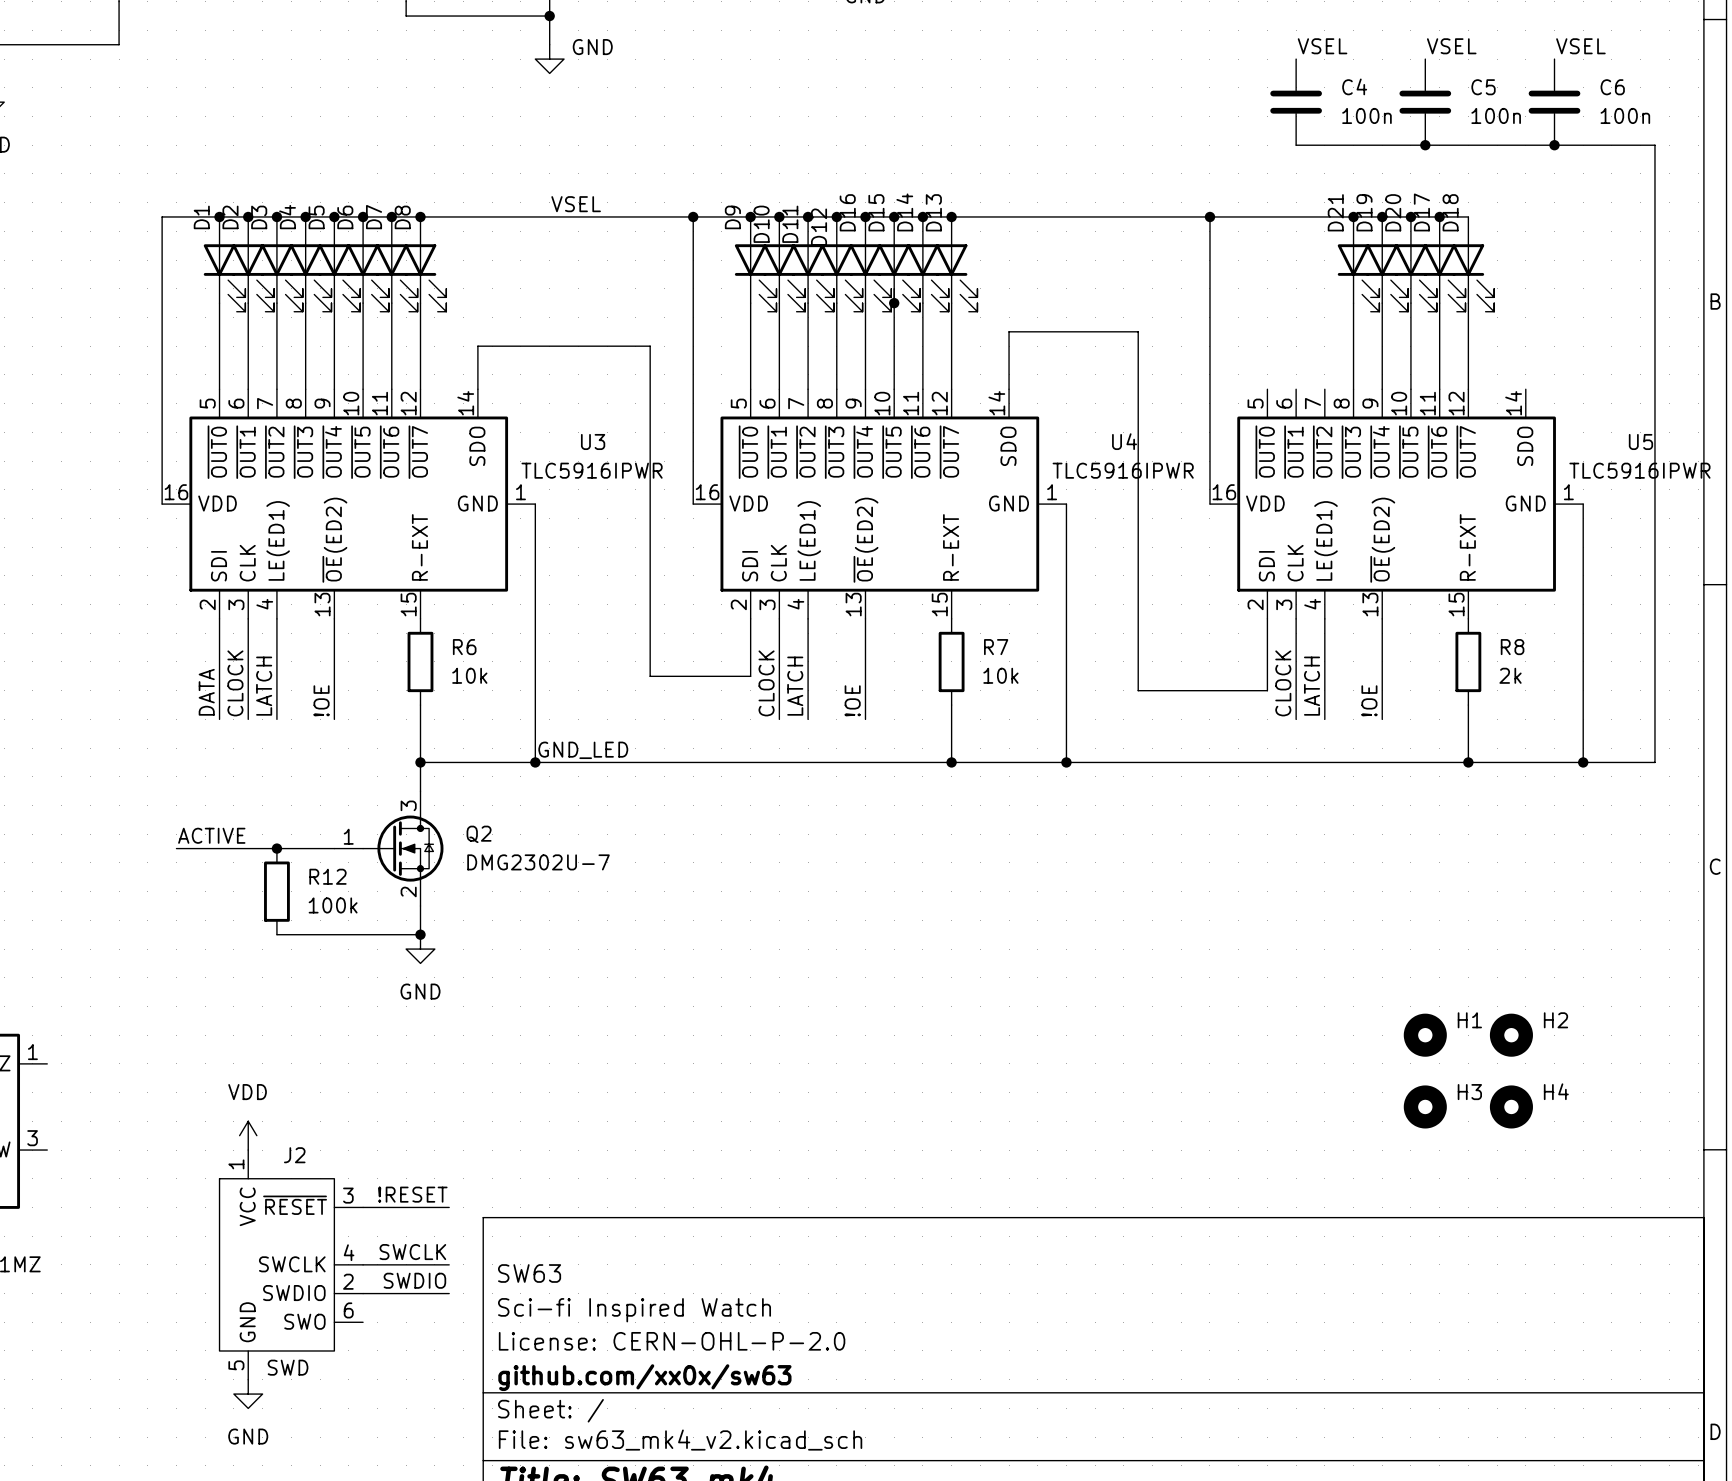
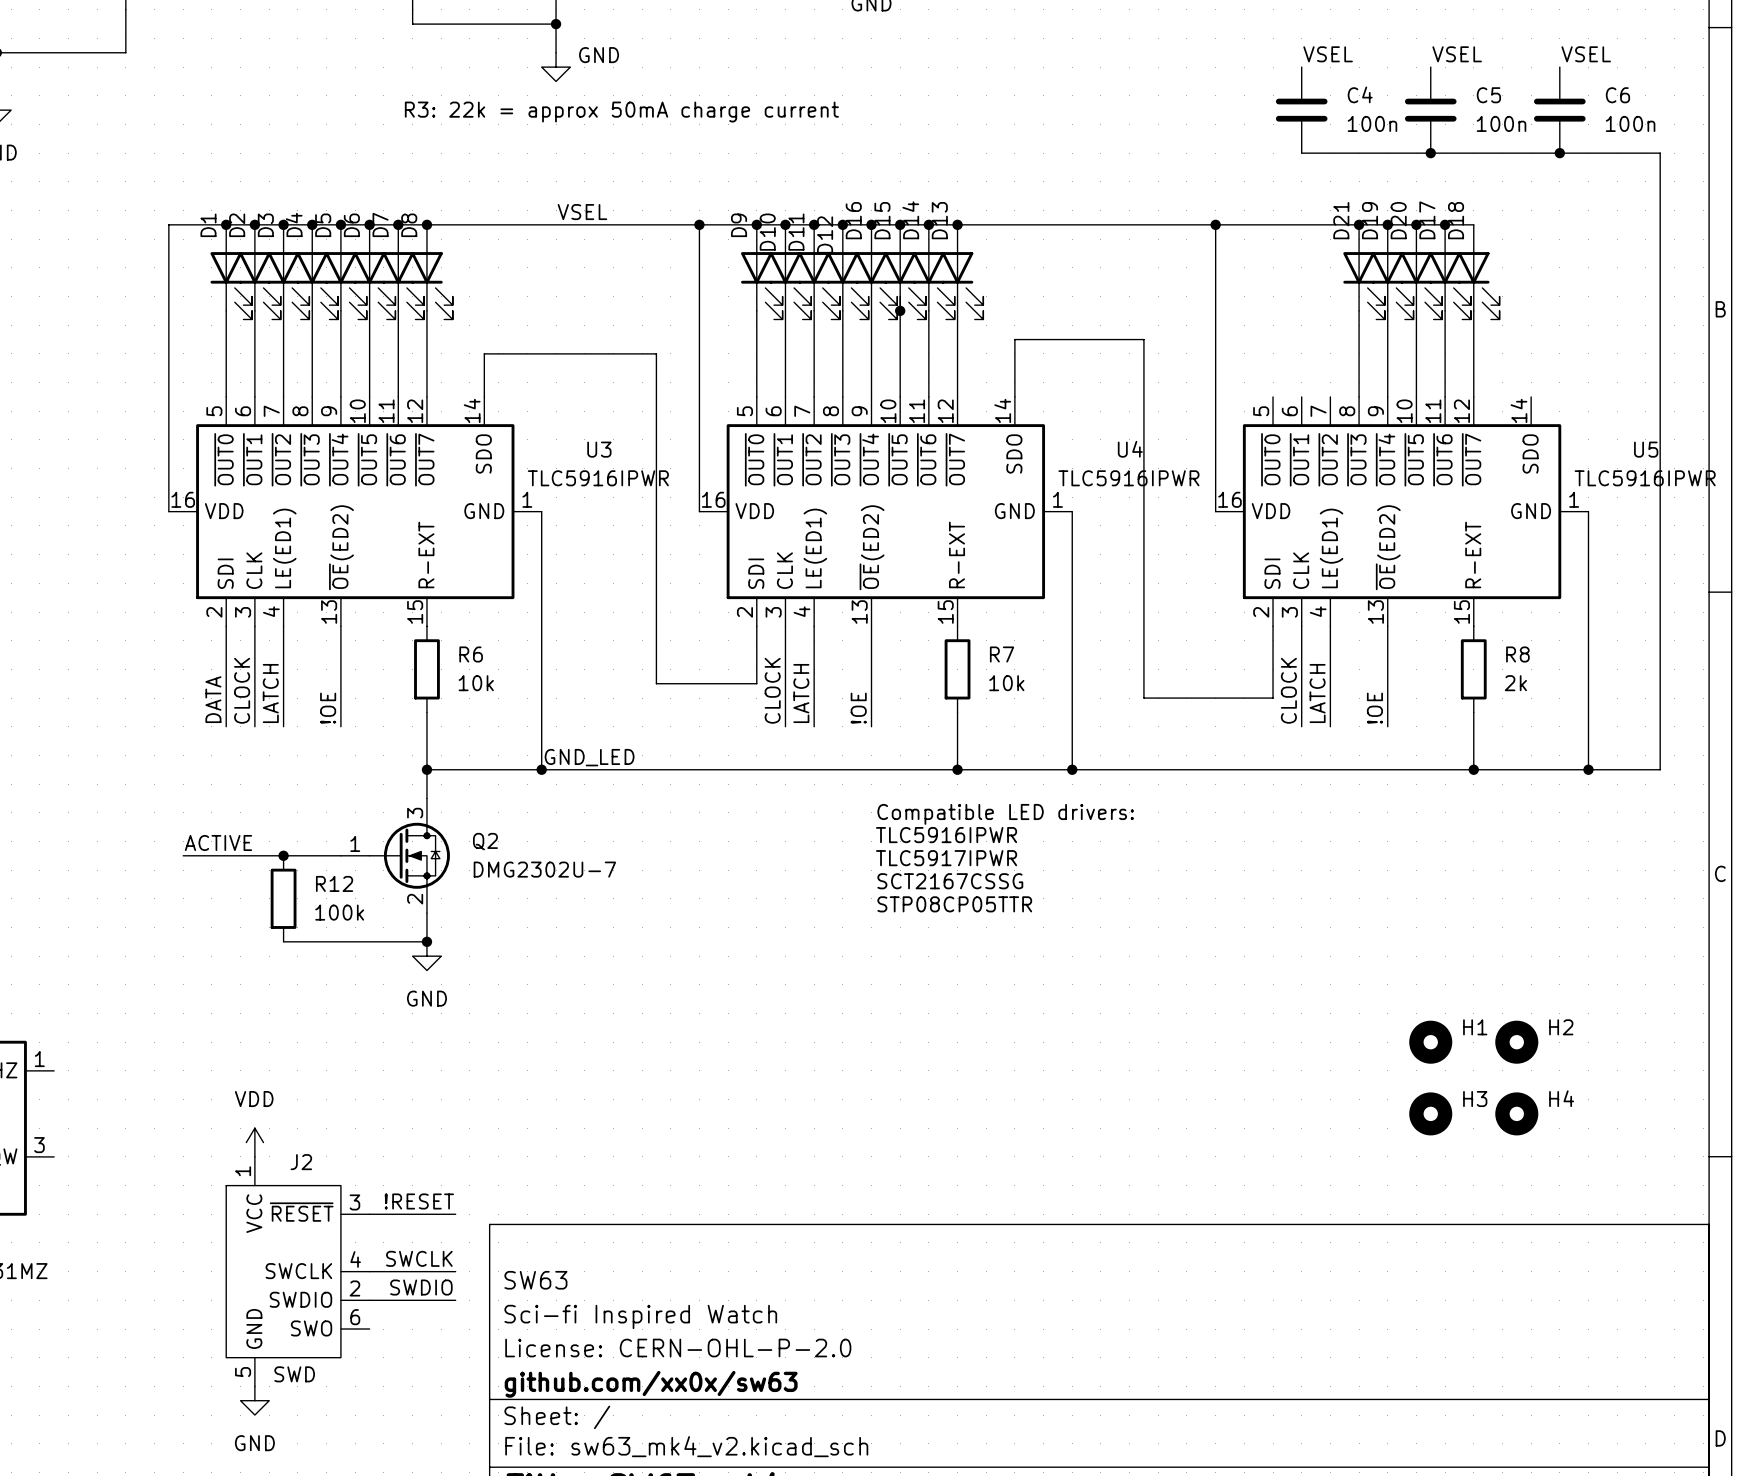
text: none -> R3: 22k = approx 50mA charge current (621, 112)
text: none -> Compatible LED drivers: (1005, 814)
text: none -> TLC5916IPWR (946, 835)
text: none -> TLC5917IPWR (946, 858)
text: none -> SCT2167CSSG (950, 881)
text: none -> STP08CP05TTR (954, 904)

